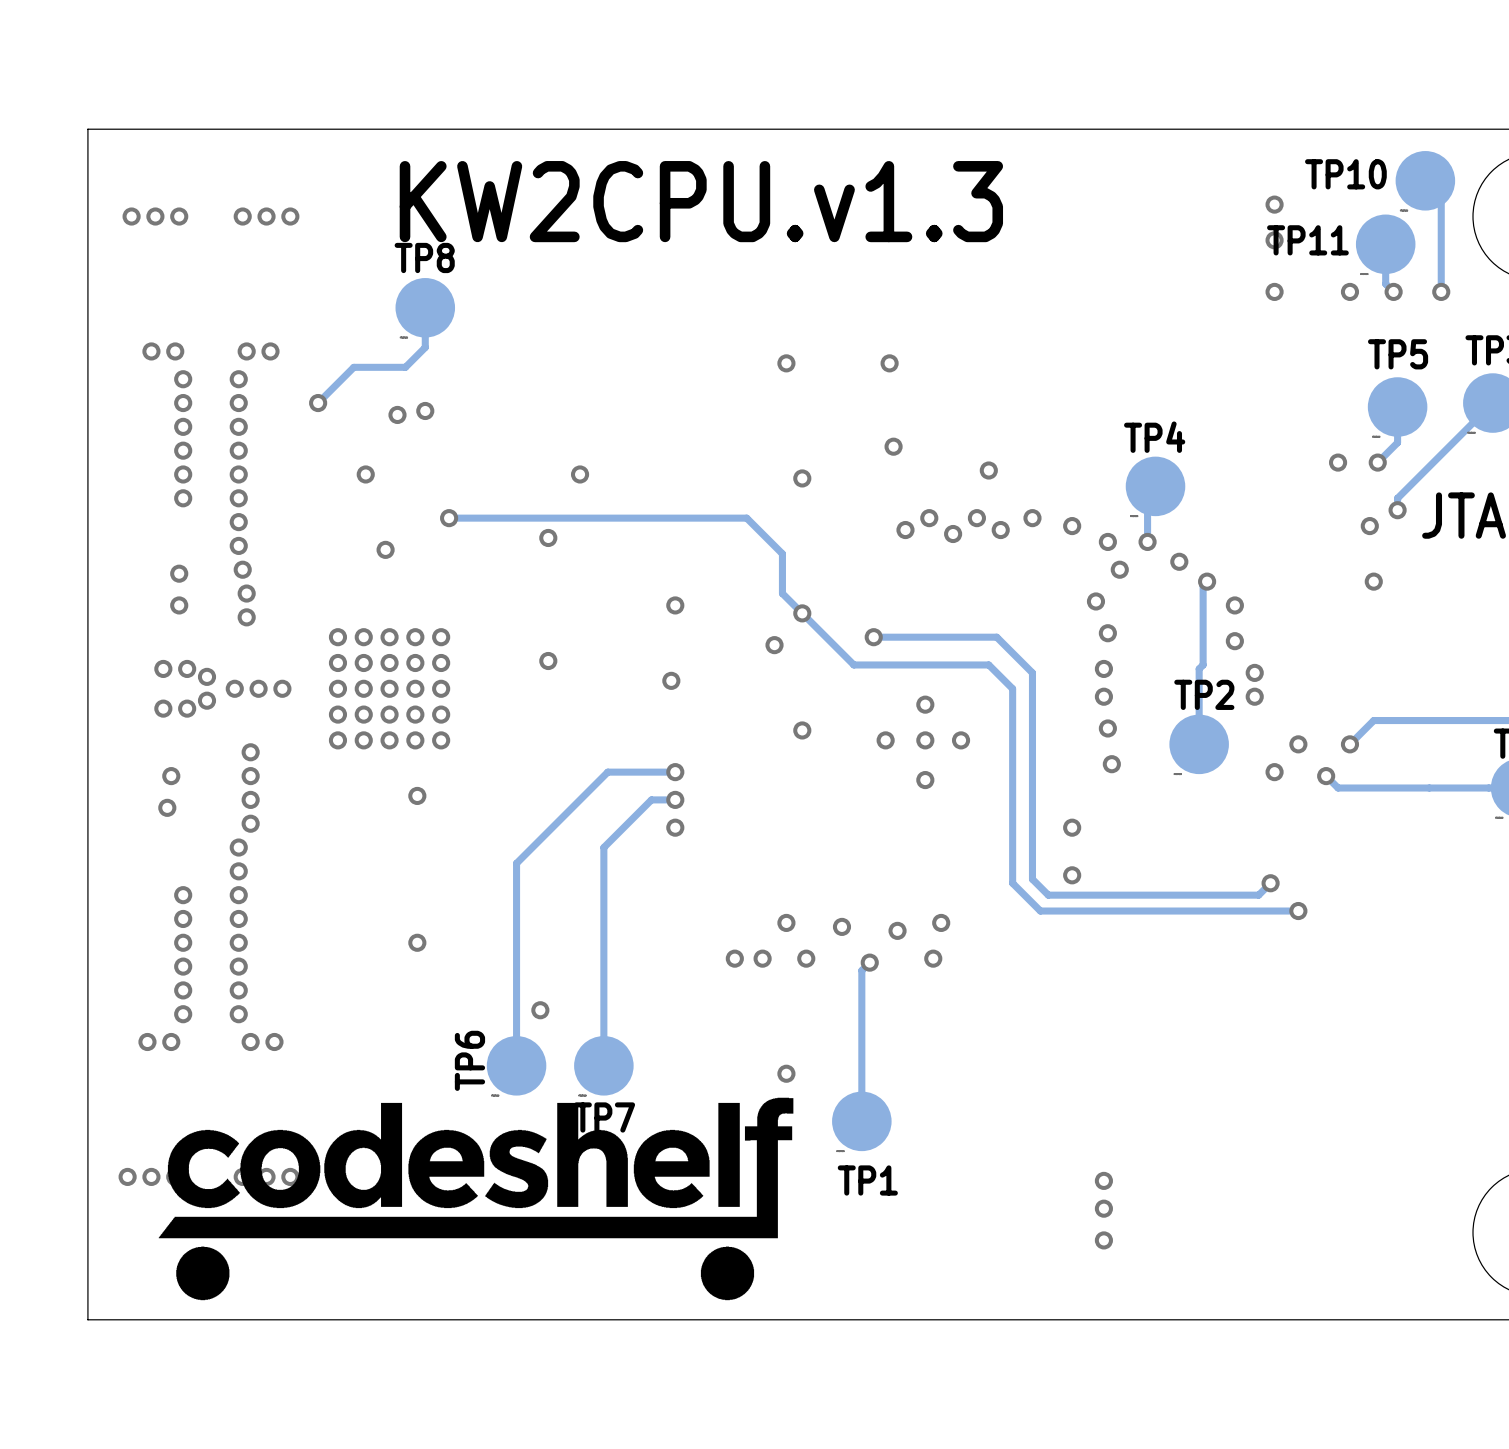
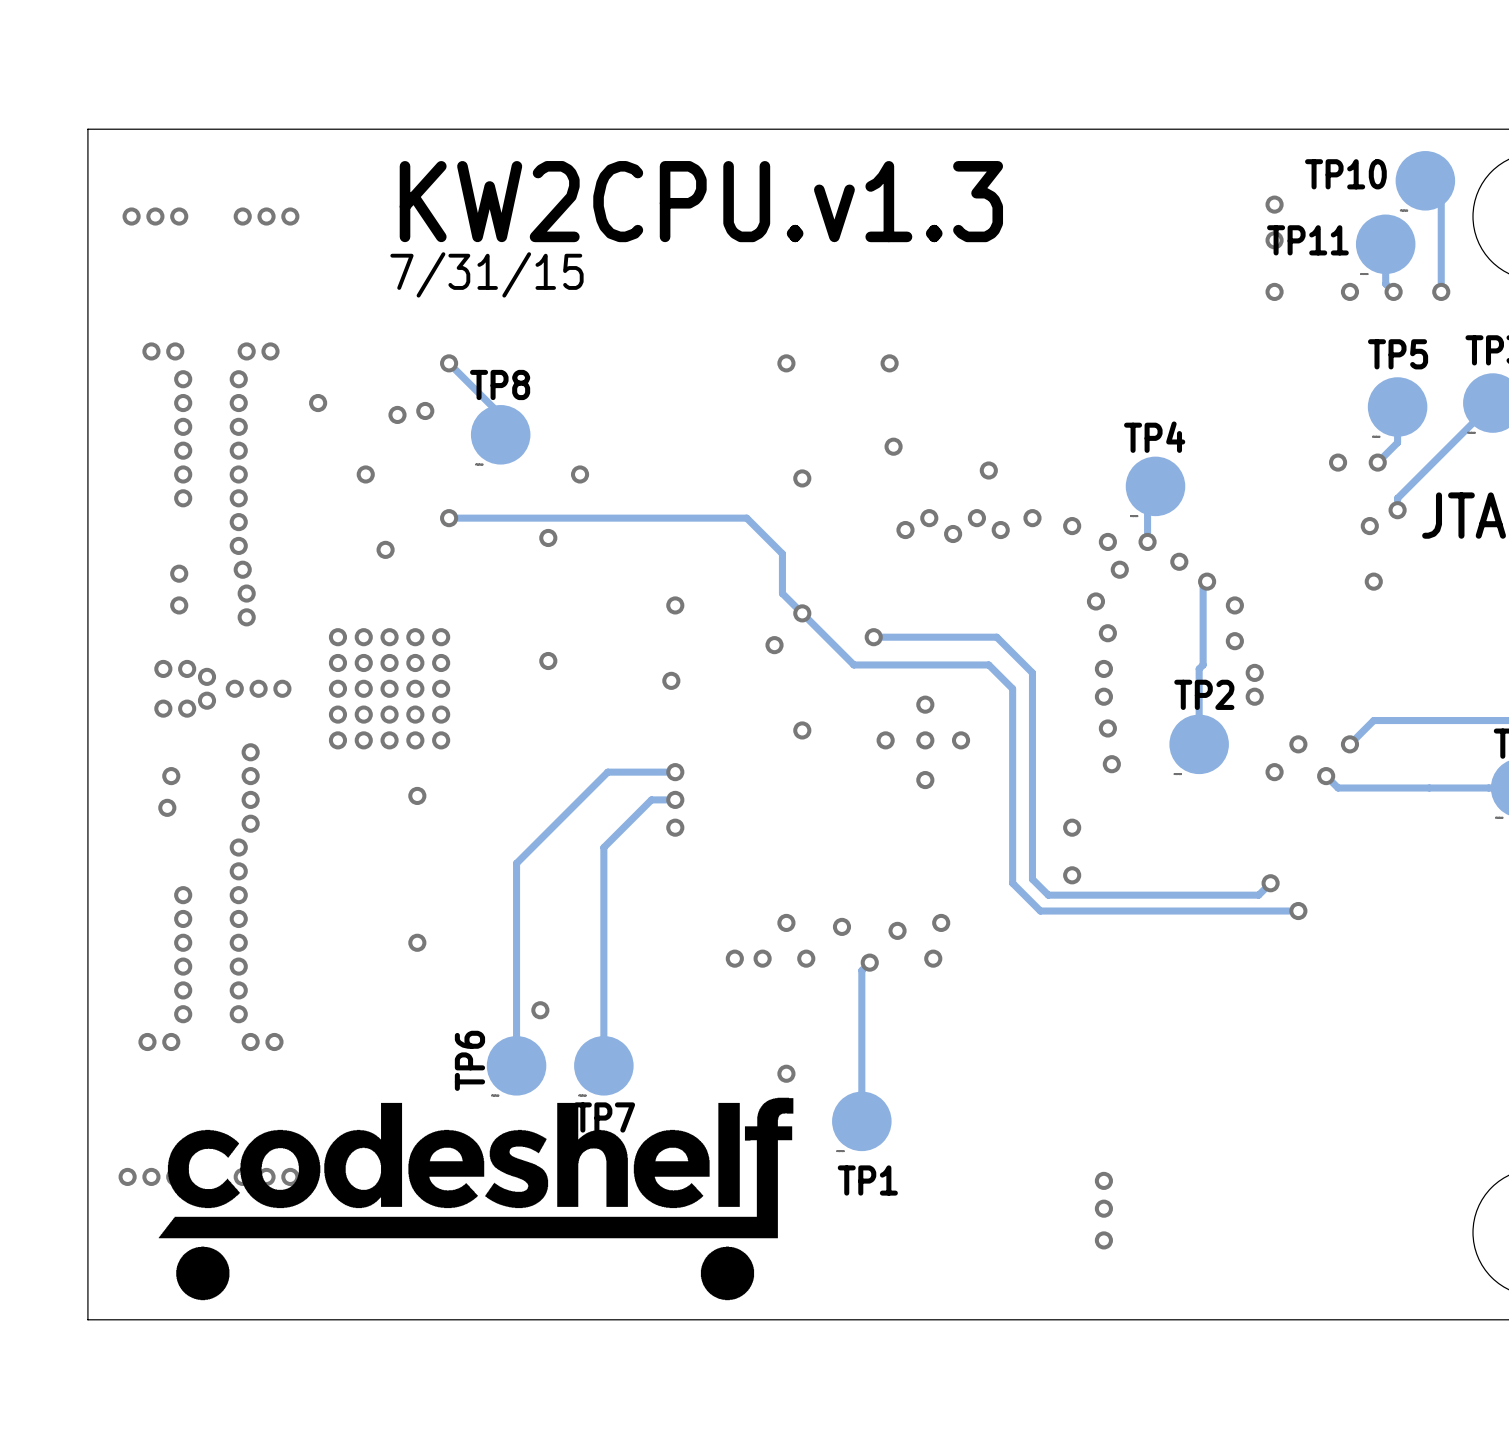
text: none -> 7/31/15 (486, 274)
track: (425, 307) (425, 347) (405, 367) (353, 367) (318, 403) -> none
TP8 position: (425, 307) -> (500, 434)
track: none -> (449, 363) (500, 414) (500, 434)
via: none -> (449, 363)

